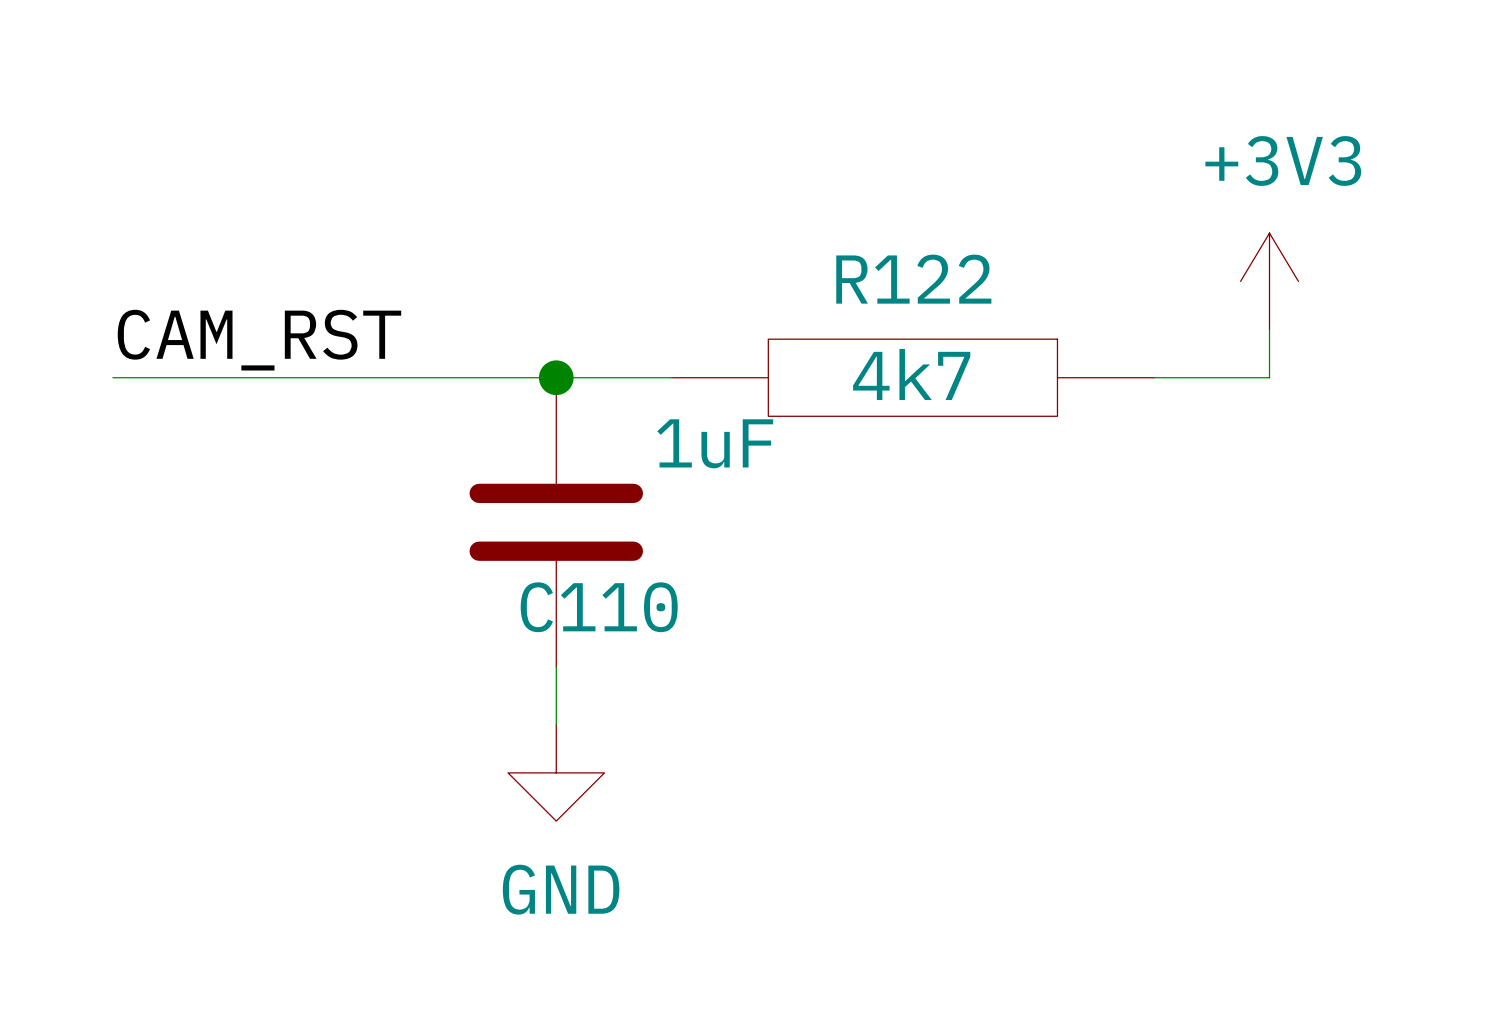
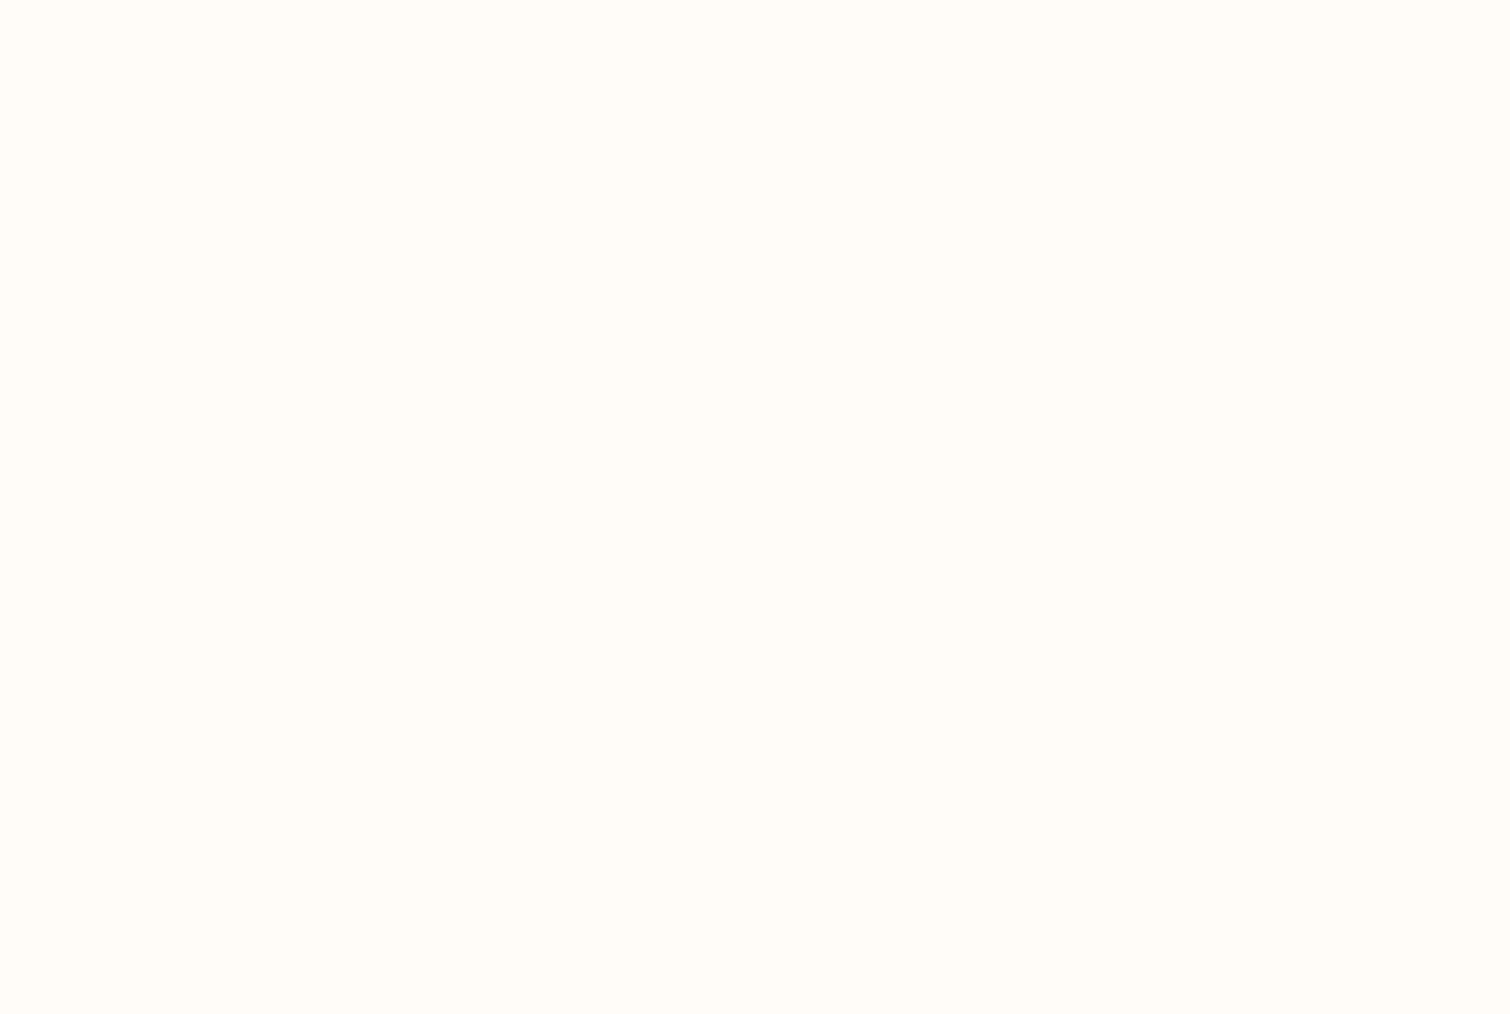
power symbol: +3V3 (1269, 281) -> none
wire: (1269, 329) (1269, 377) (1153, 377) -> none
label: CAM_RST (259, 340) -> none
wire: (112, 377) (671, 377) -> none
junction: (556, 377) -> none
R122: 4k7 (912, 377) -> none
C110: 1uF (556, 522) -> none
wire: (556, 666) (556, 724) -> none
power symbol: GND (556, 772) -> none

